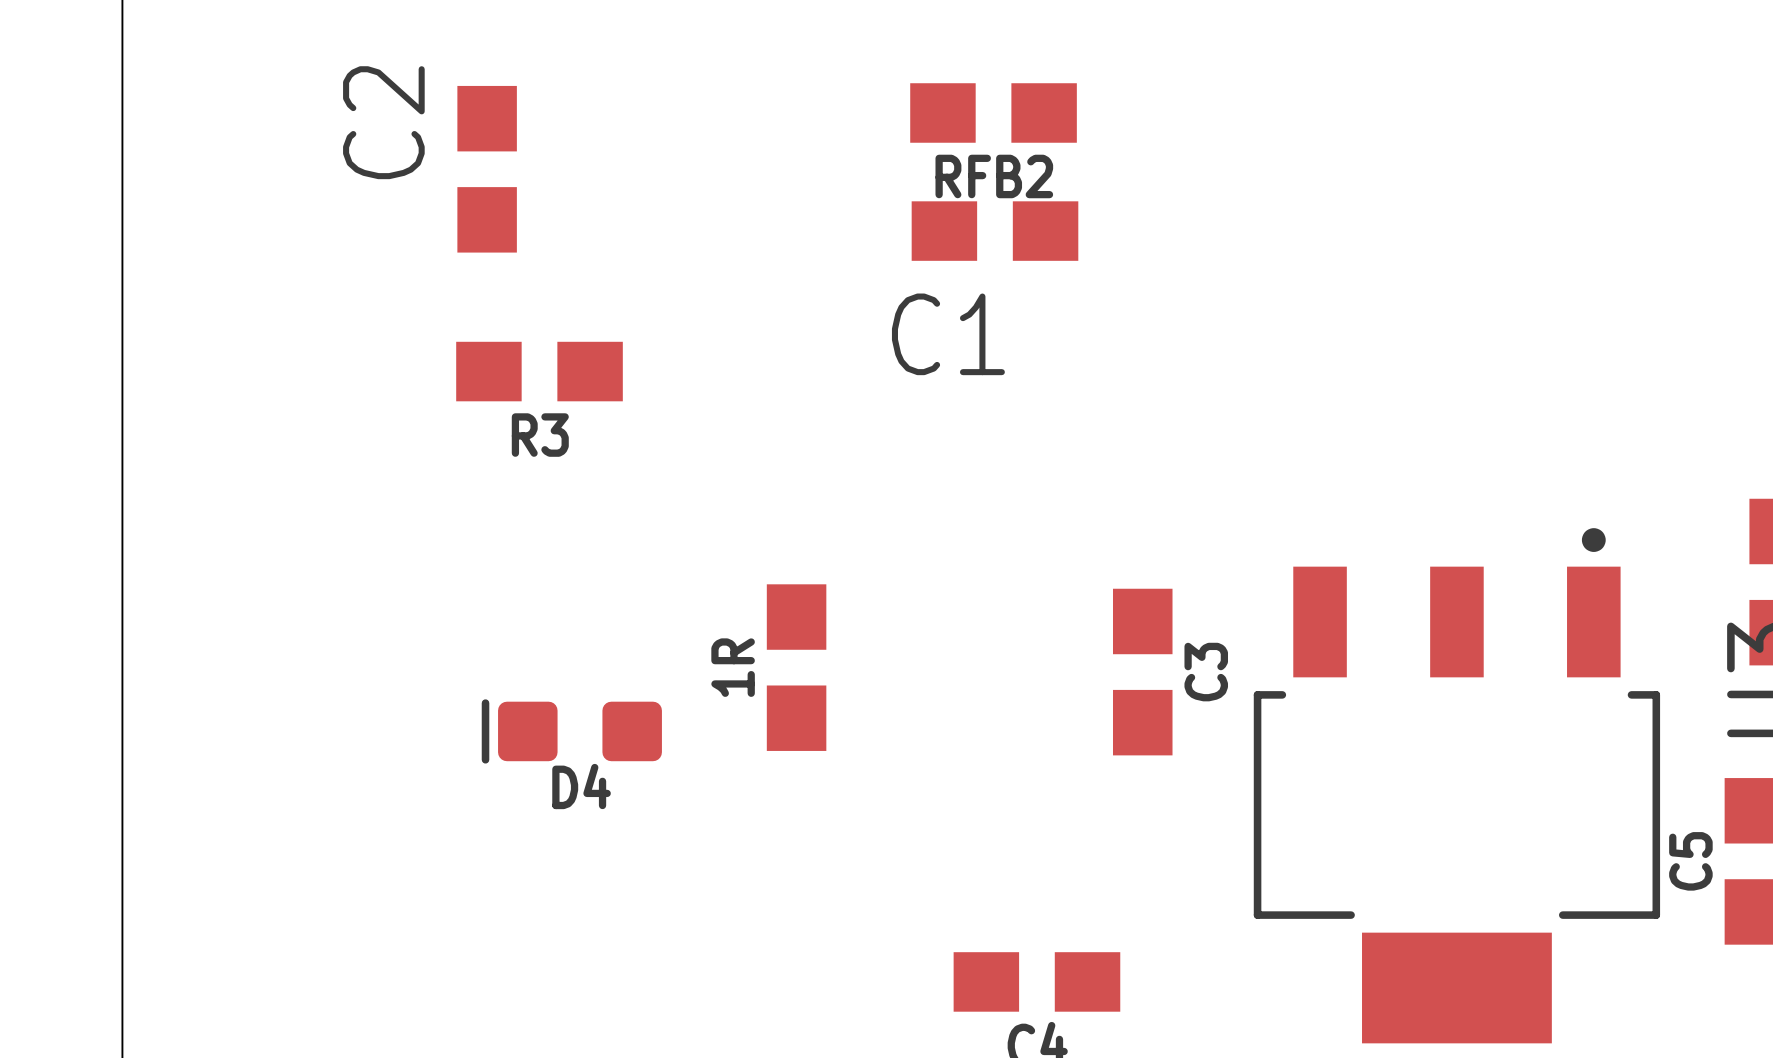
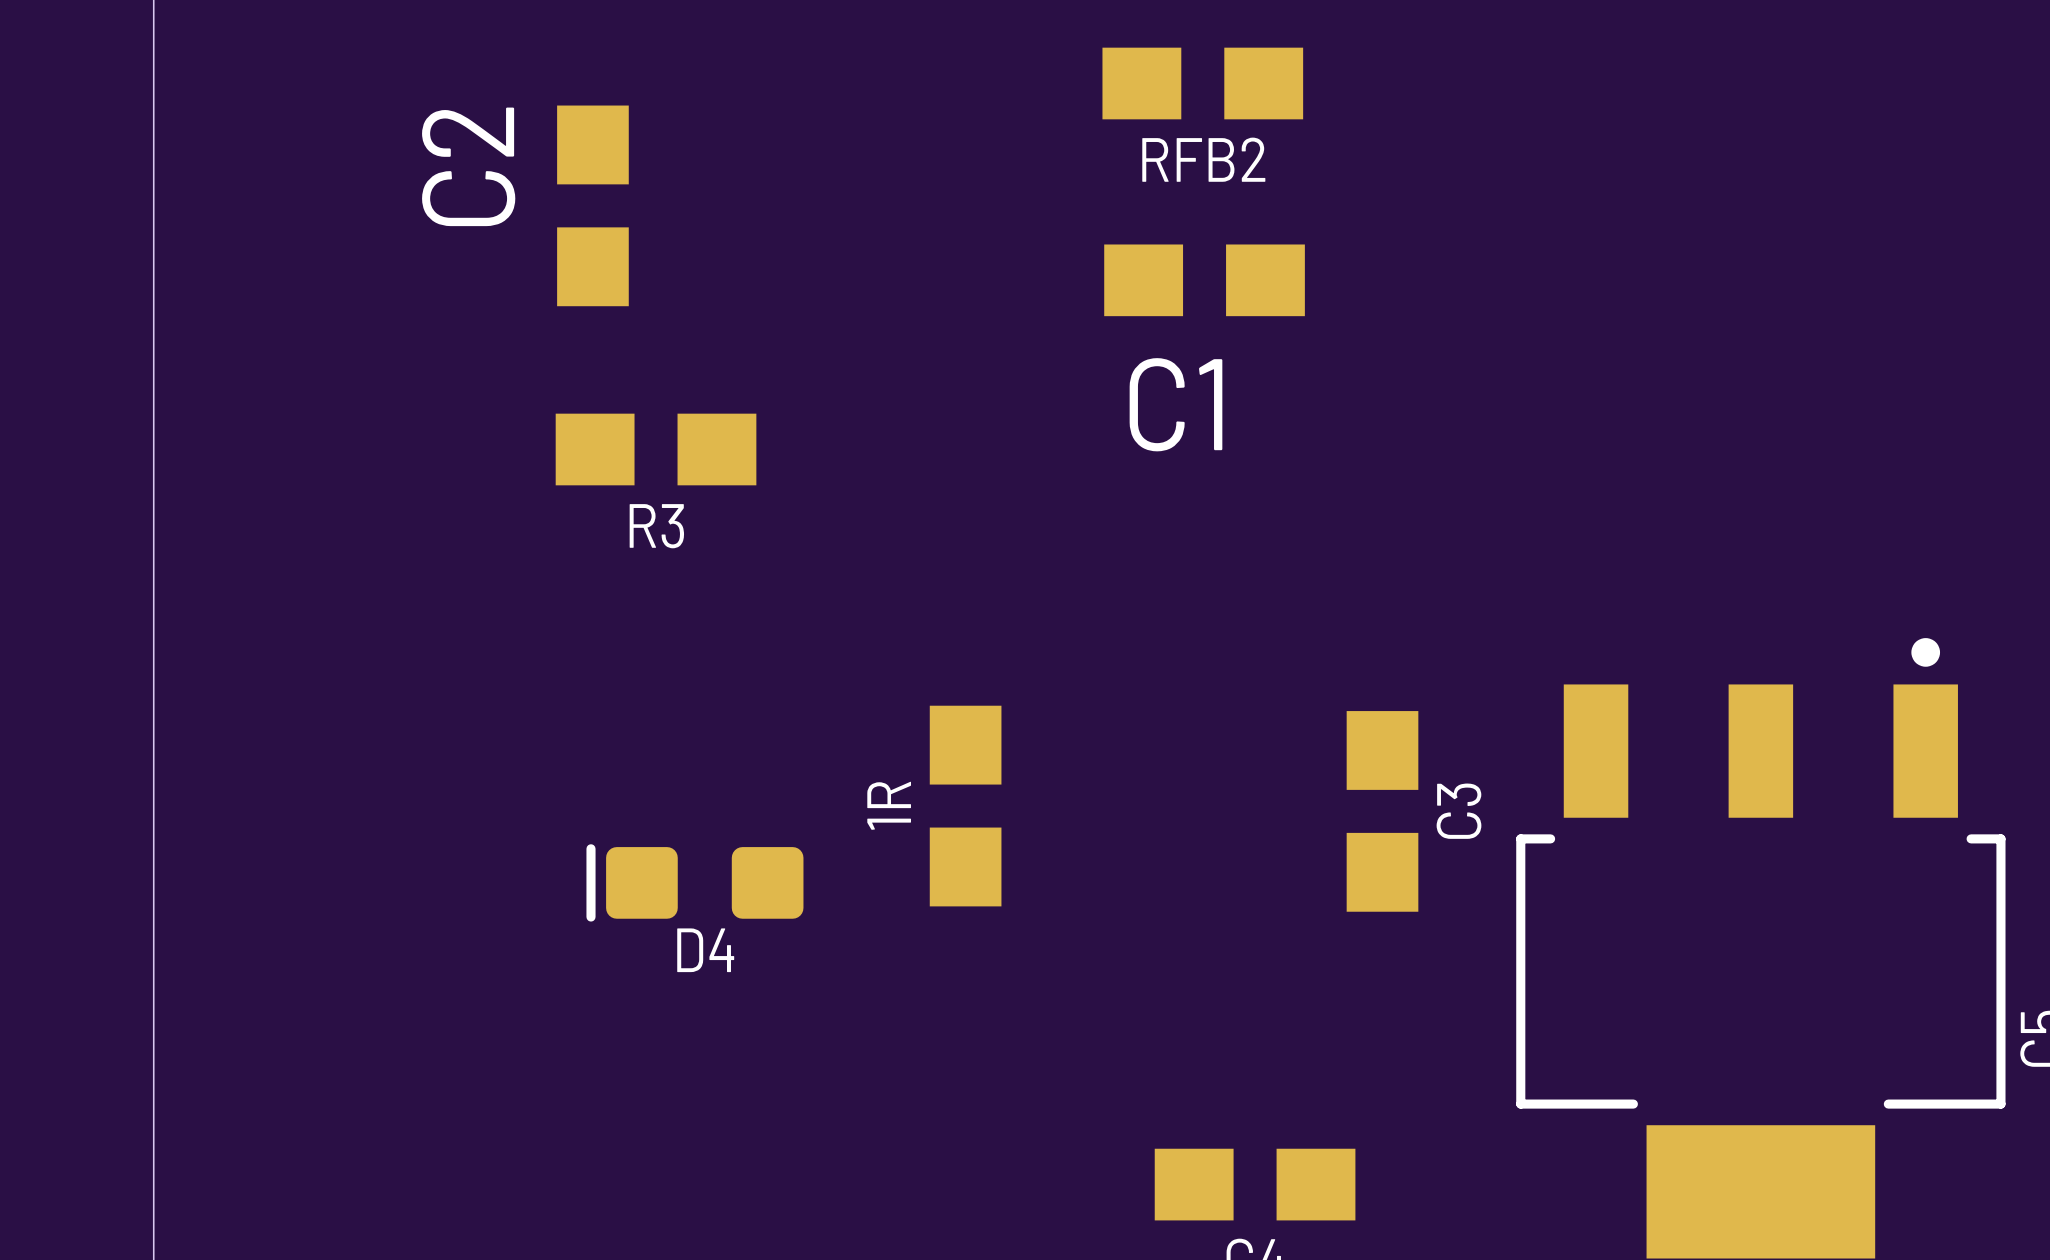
RFB2 position: (993, 112) -> (1202, 83)

